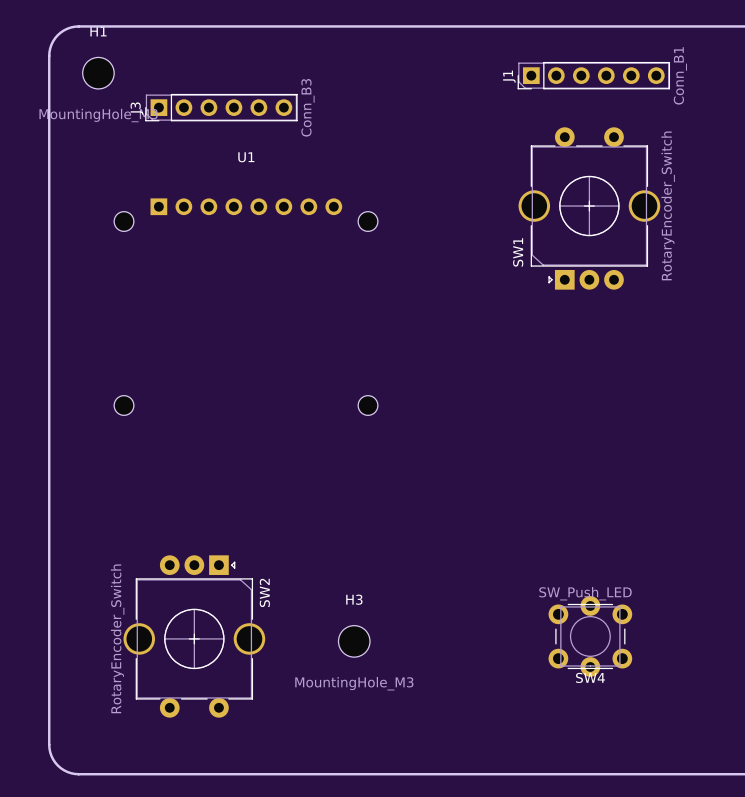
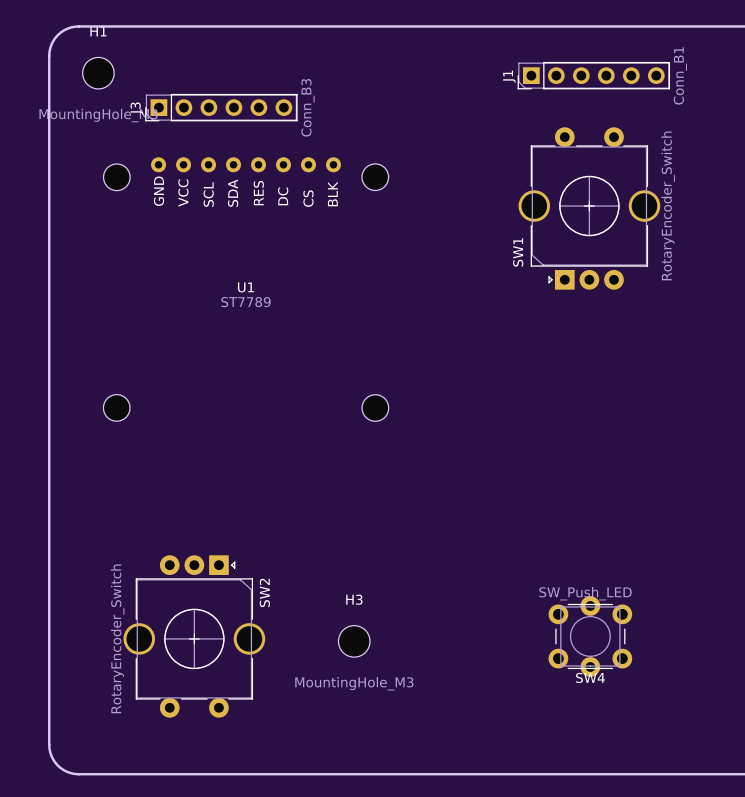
U1 name position: U1 (246, 157) -> U1 (245, 287)
U1 footprint: [114, 198, 378, 416] -> [103, 157, 389, 422]
U1 value: none -> ST7789 (245, 302)

